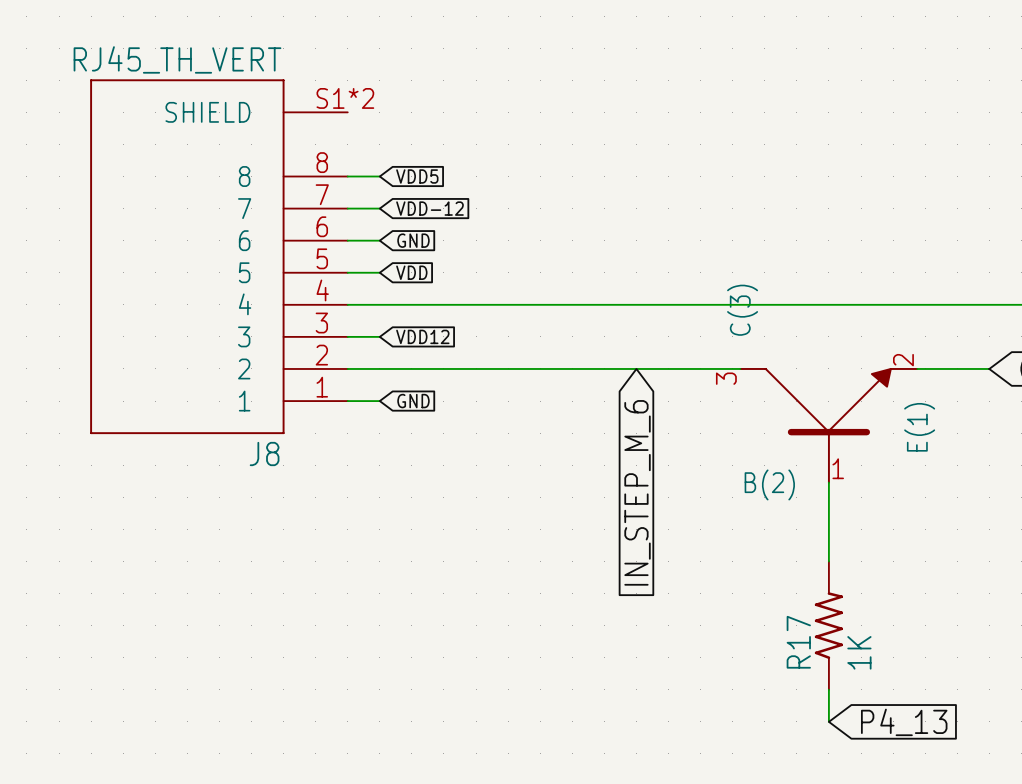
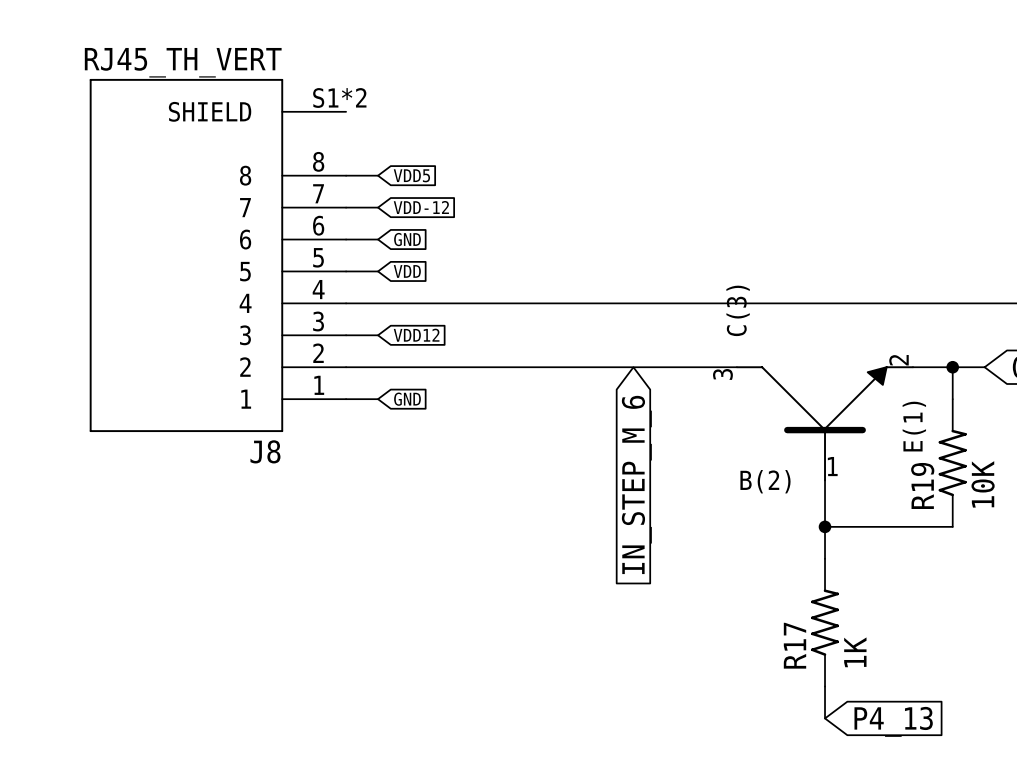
wire: none -> (952, 367) (952, 399)
junction: none -> (952, 367)
R19: none -> 10K (952, 463)
wire: none -> (825, 526) (952, 526)
junction: none -> (825, 526)

